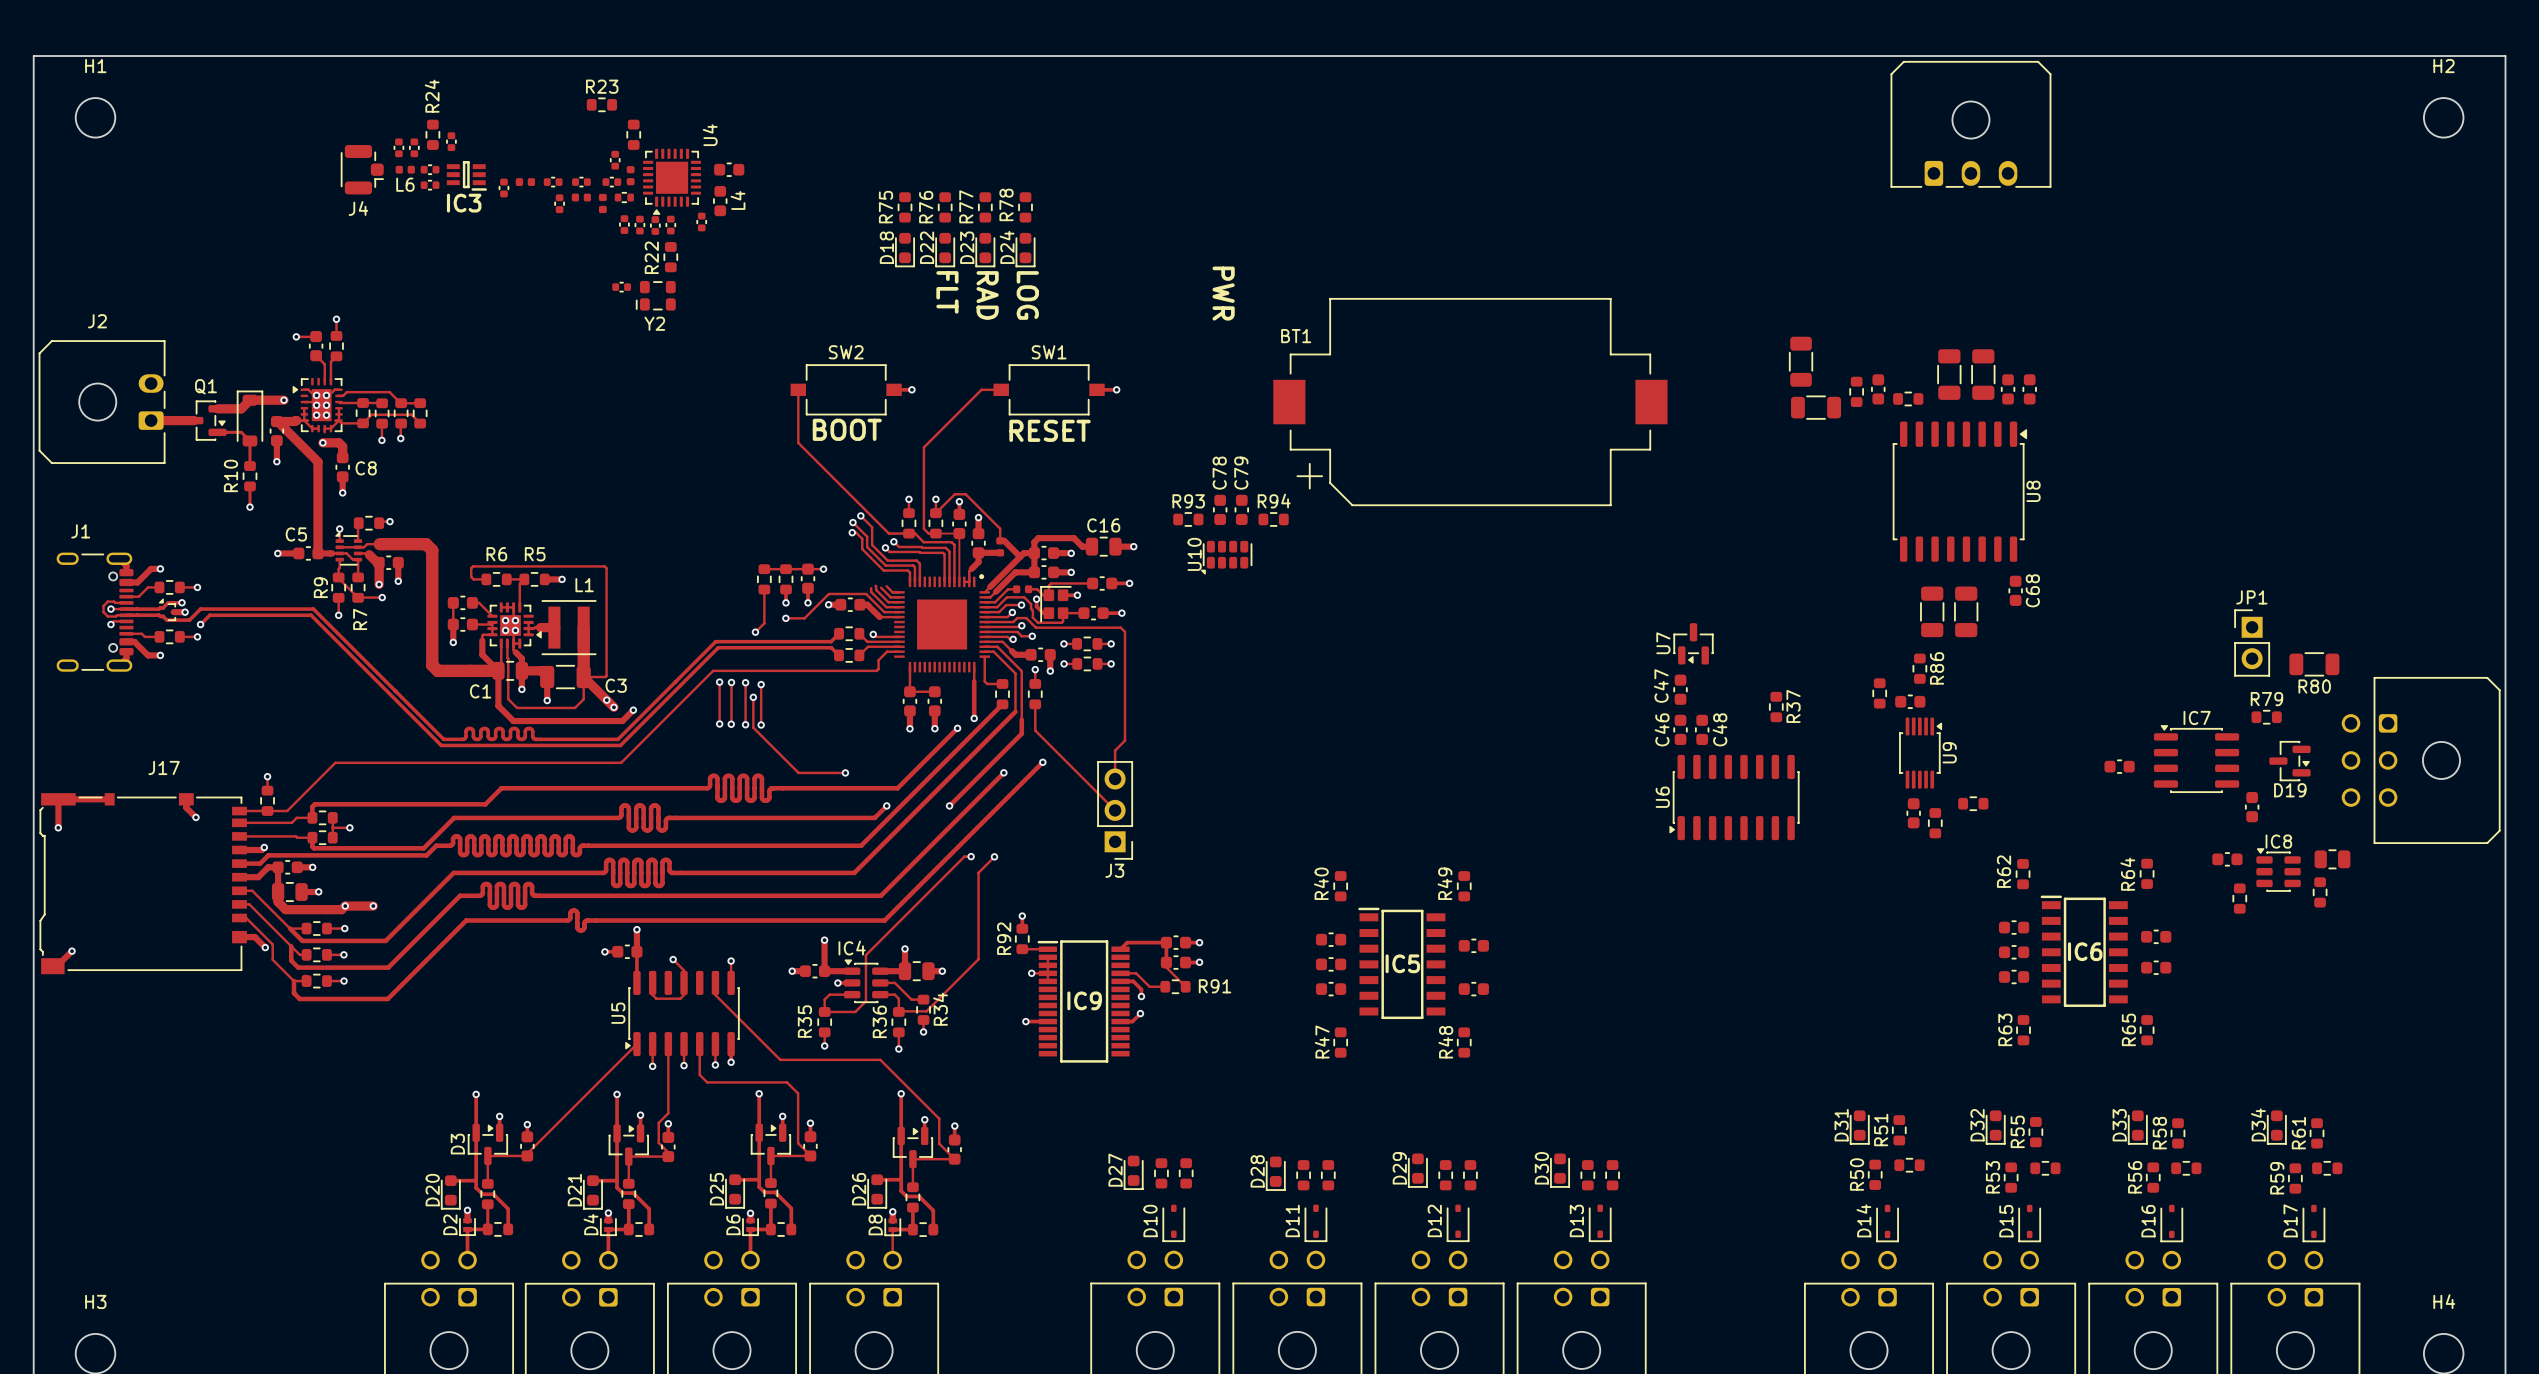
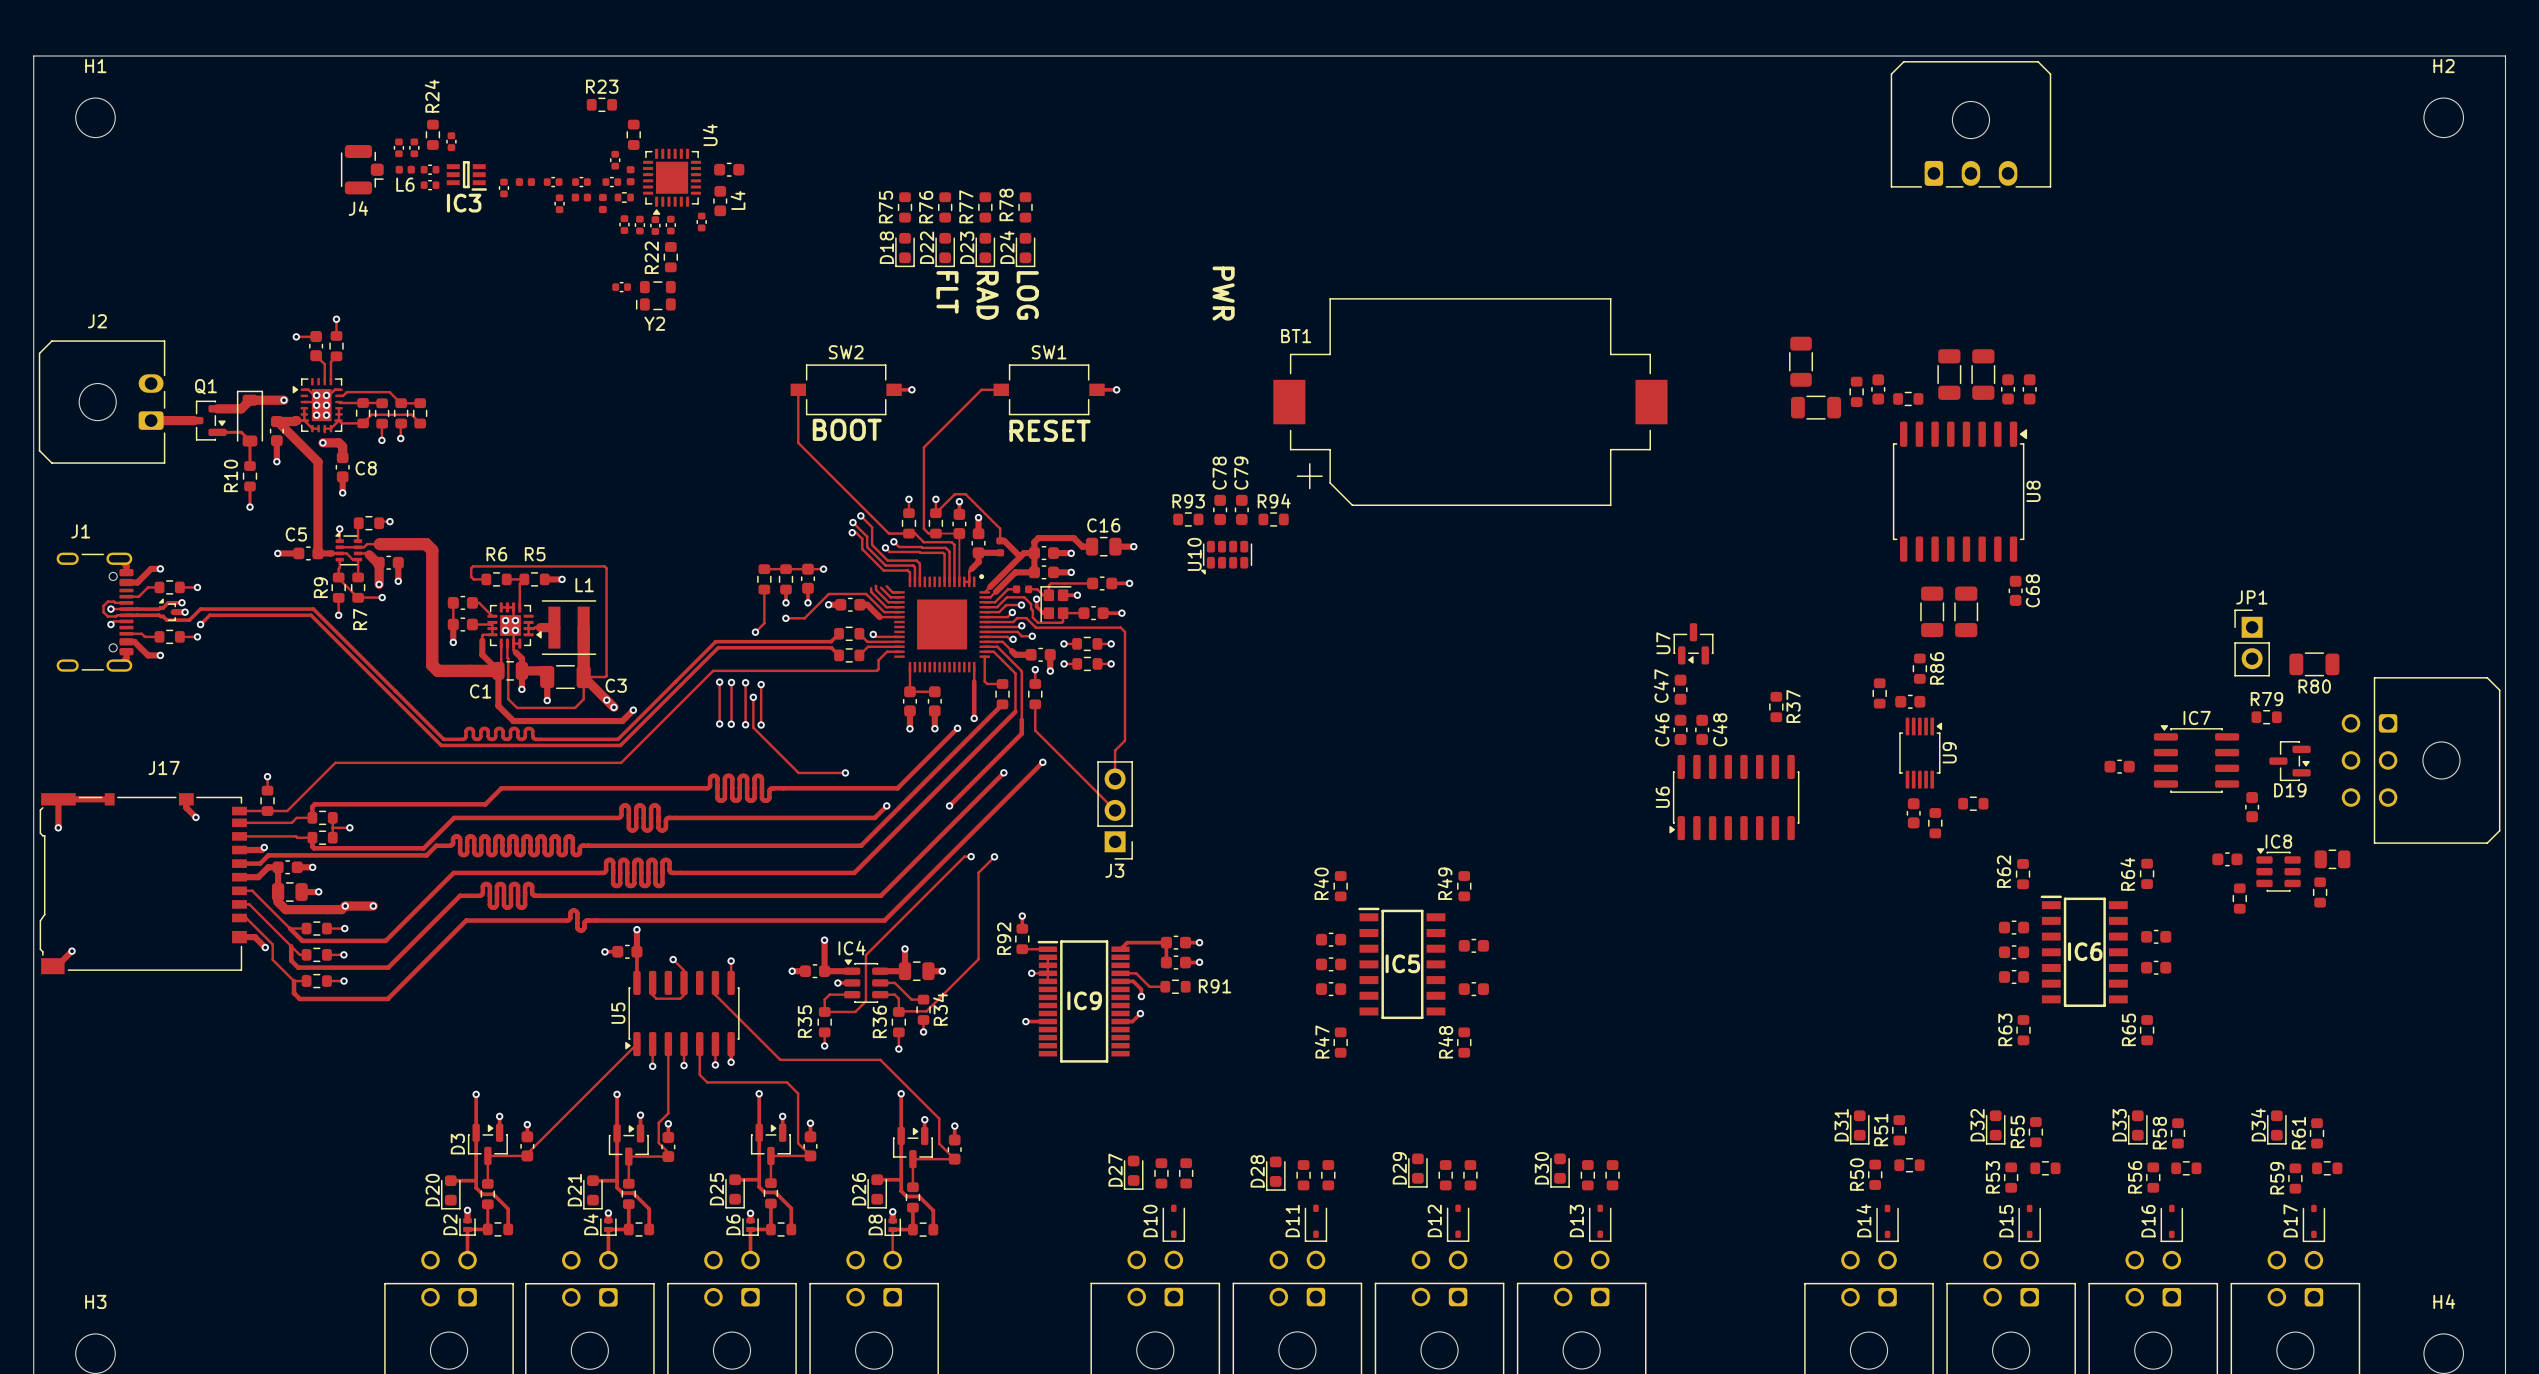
track: (1166, 962) (1166, 967) (1185, 986) -> none

